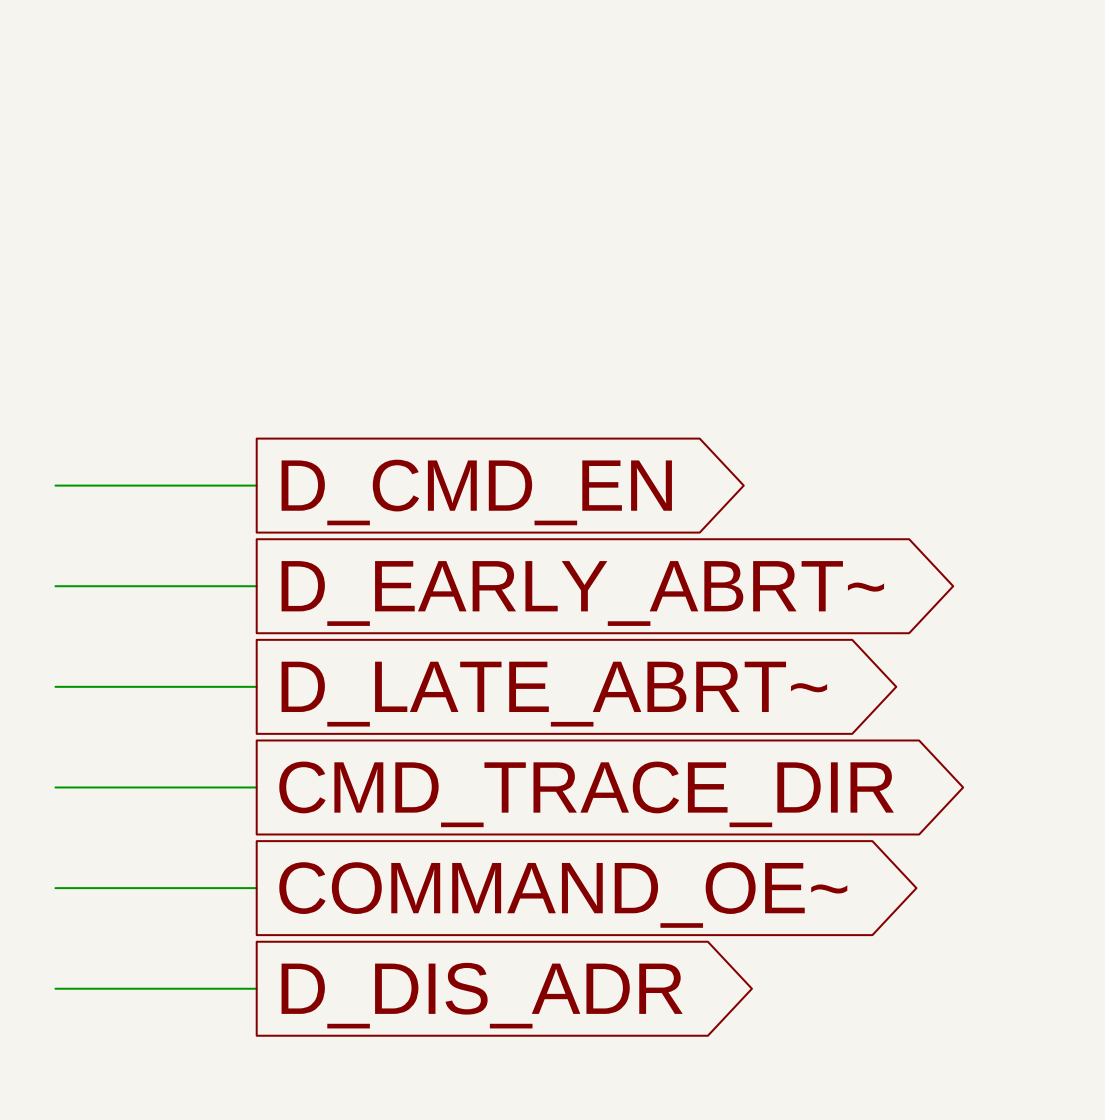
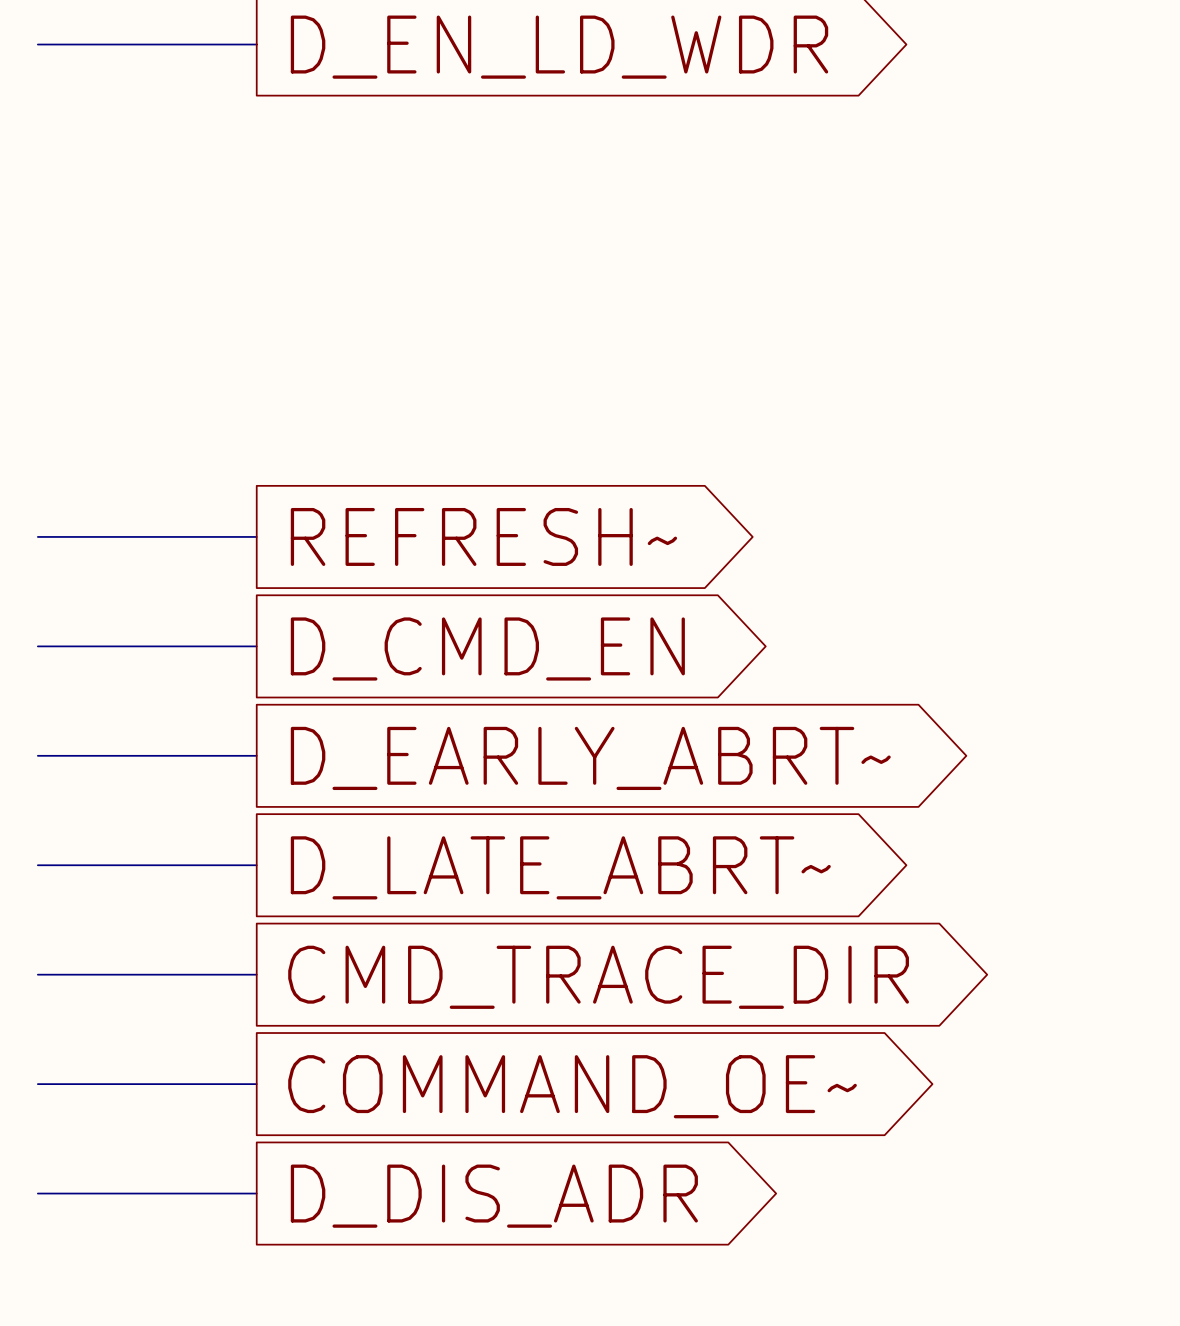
wire: none -> (37, 536) (256, 536)
global label: none -> REFRESH~ (483, 536)

